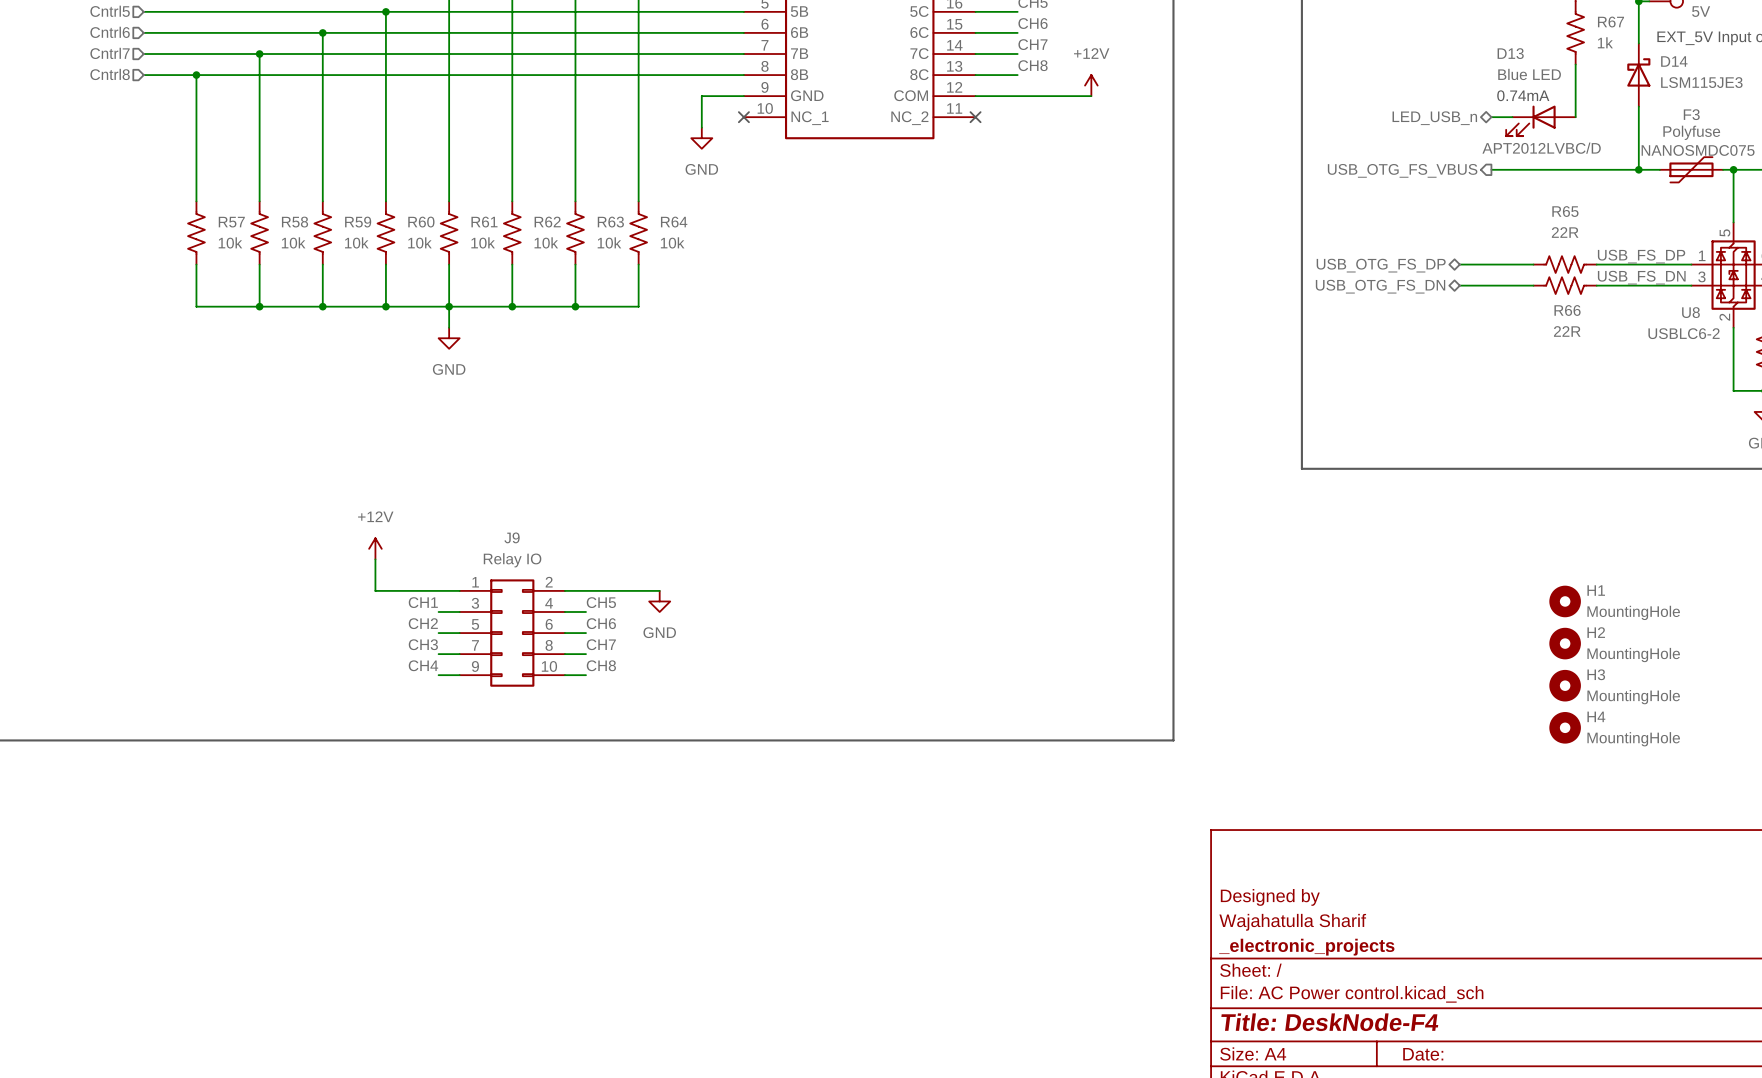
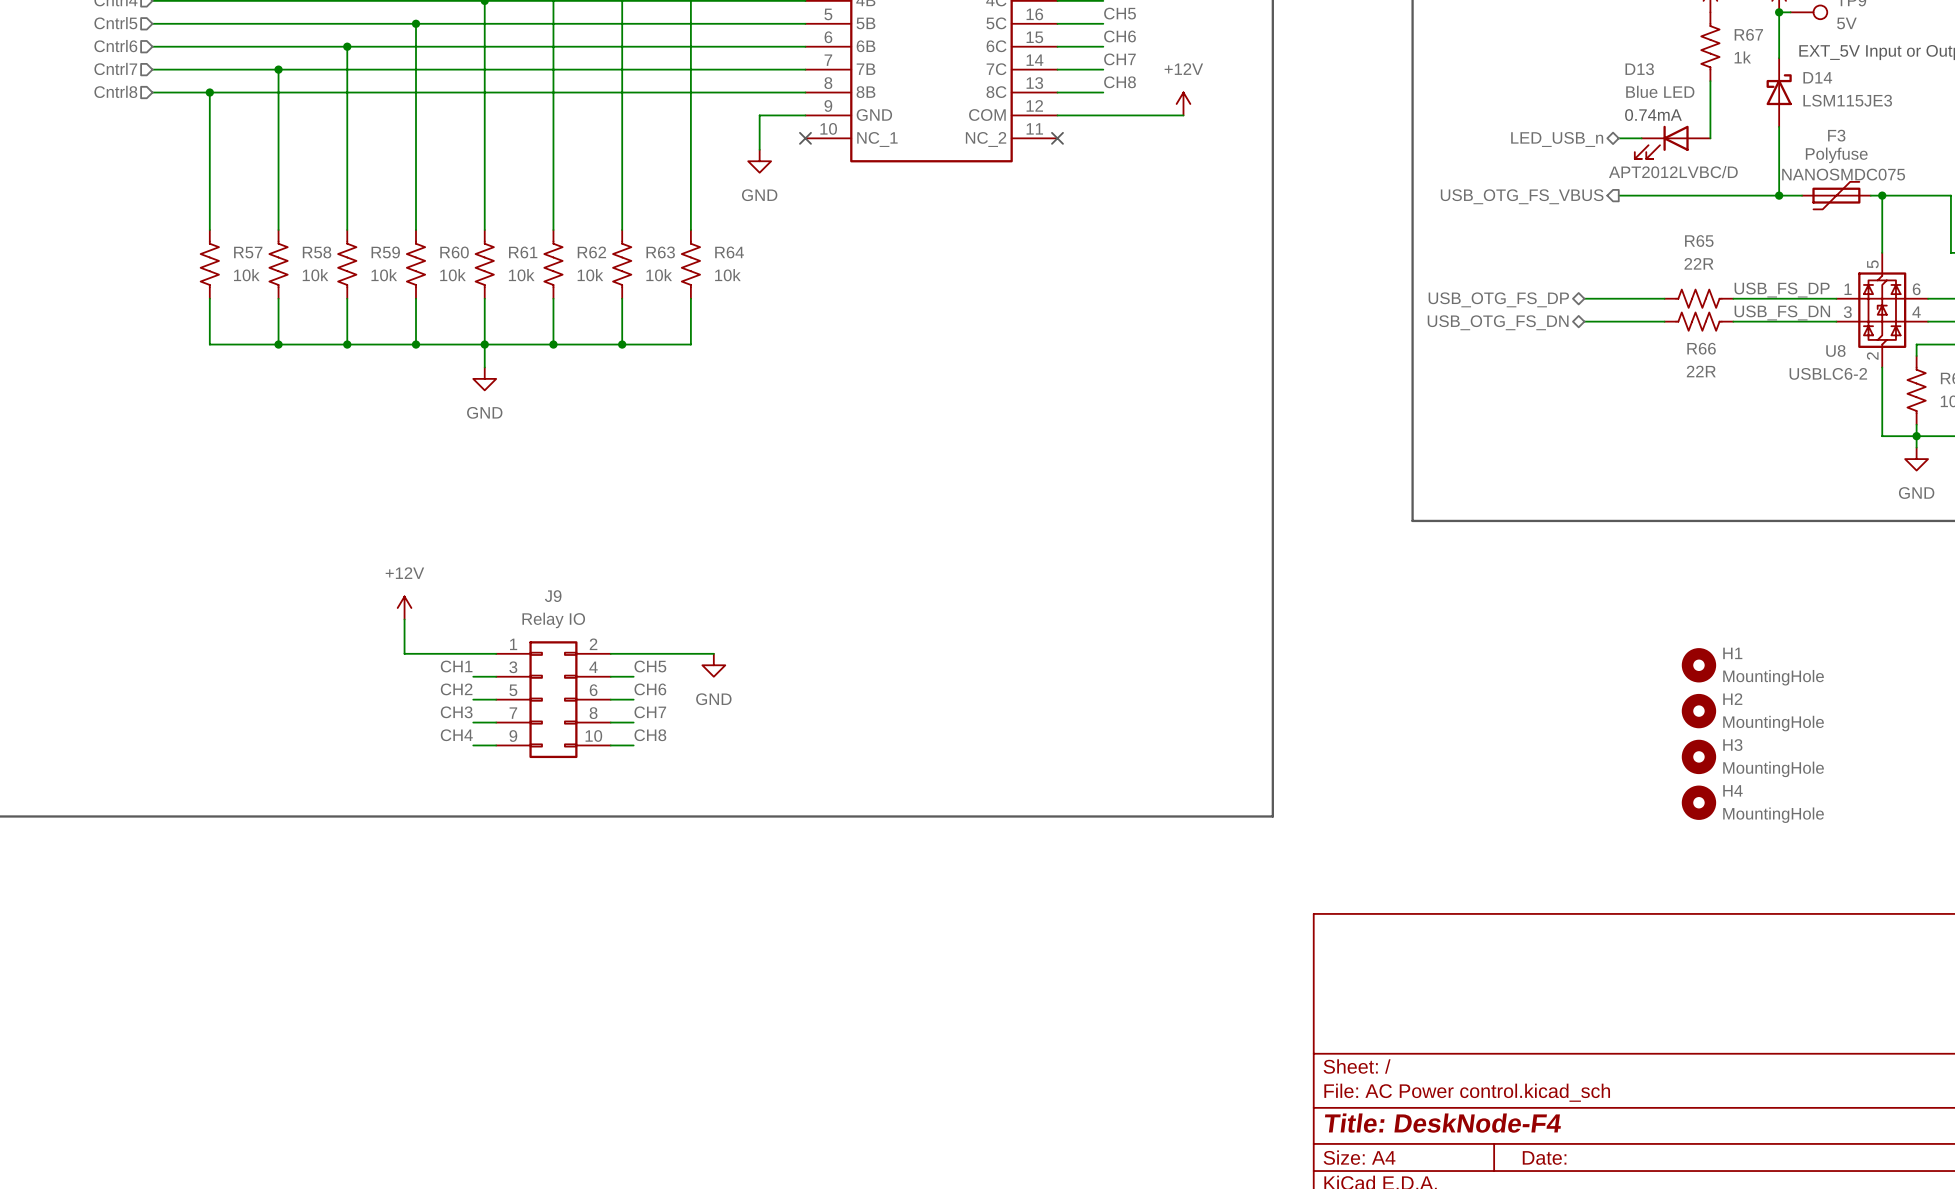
title block: Designed by (1270, 897) -> none
title block: Wajahatulla Sharif (1292, 922) -> none
title block: _electronic_projects (1306, 947) -> none

